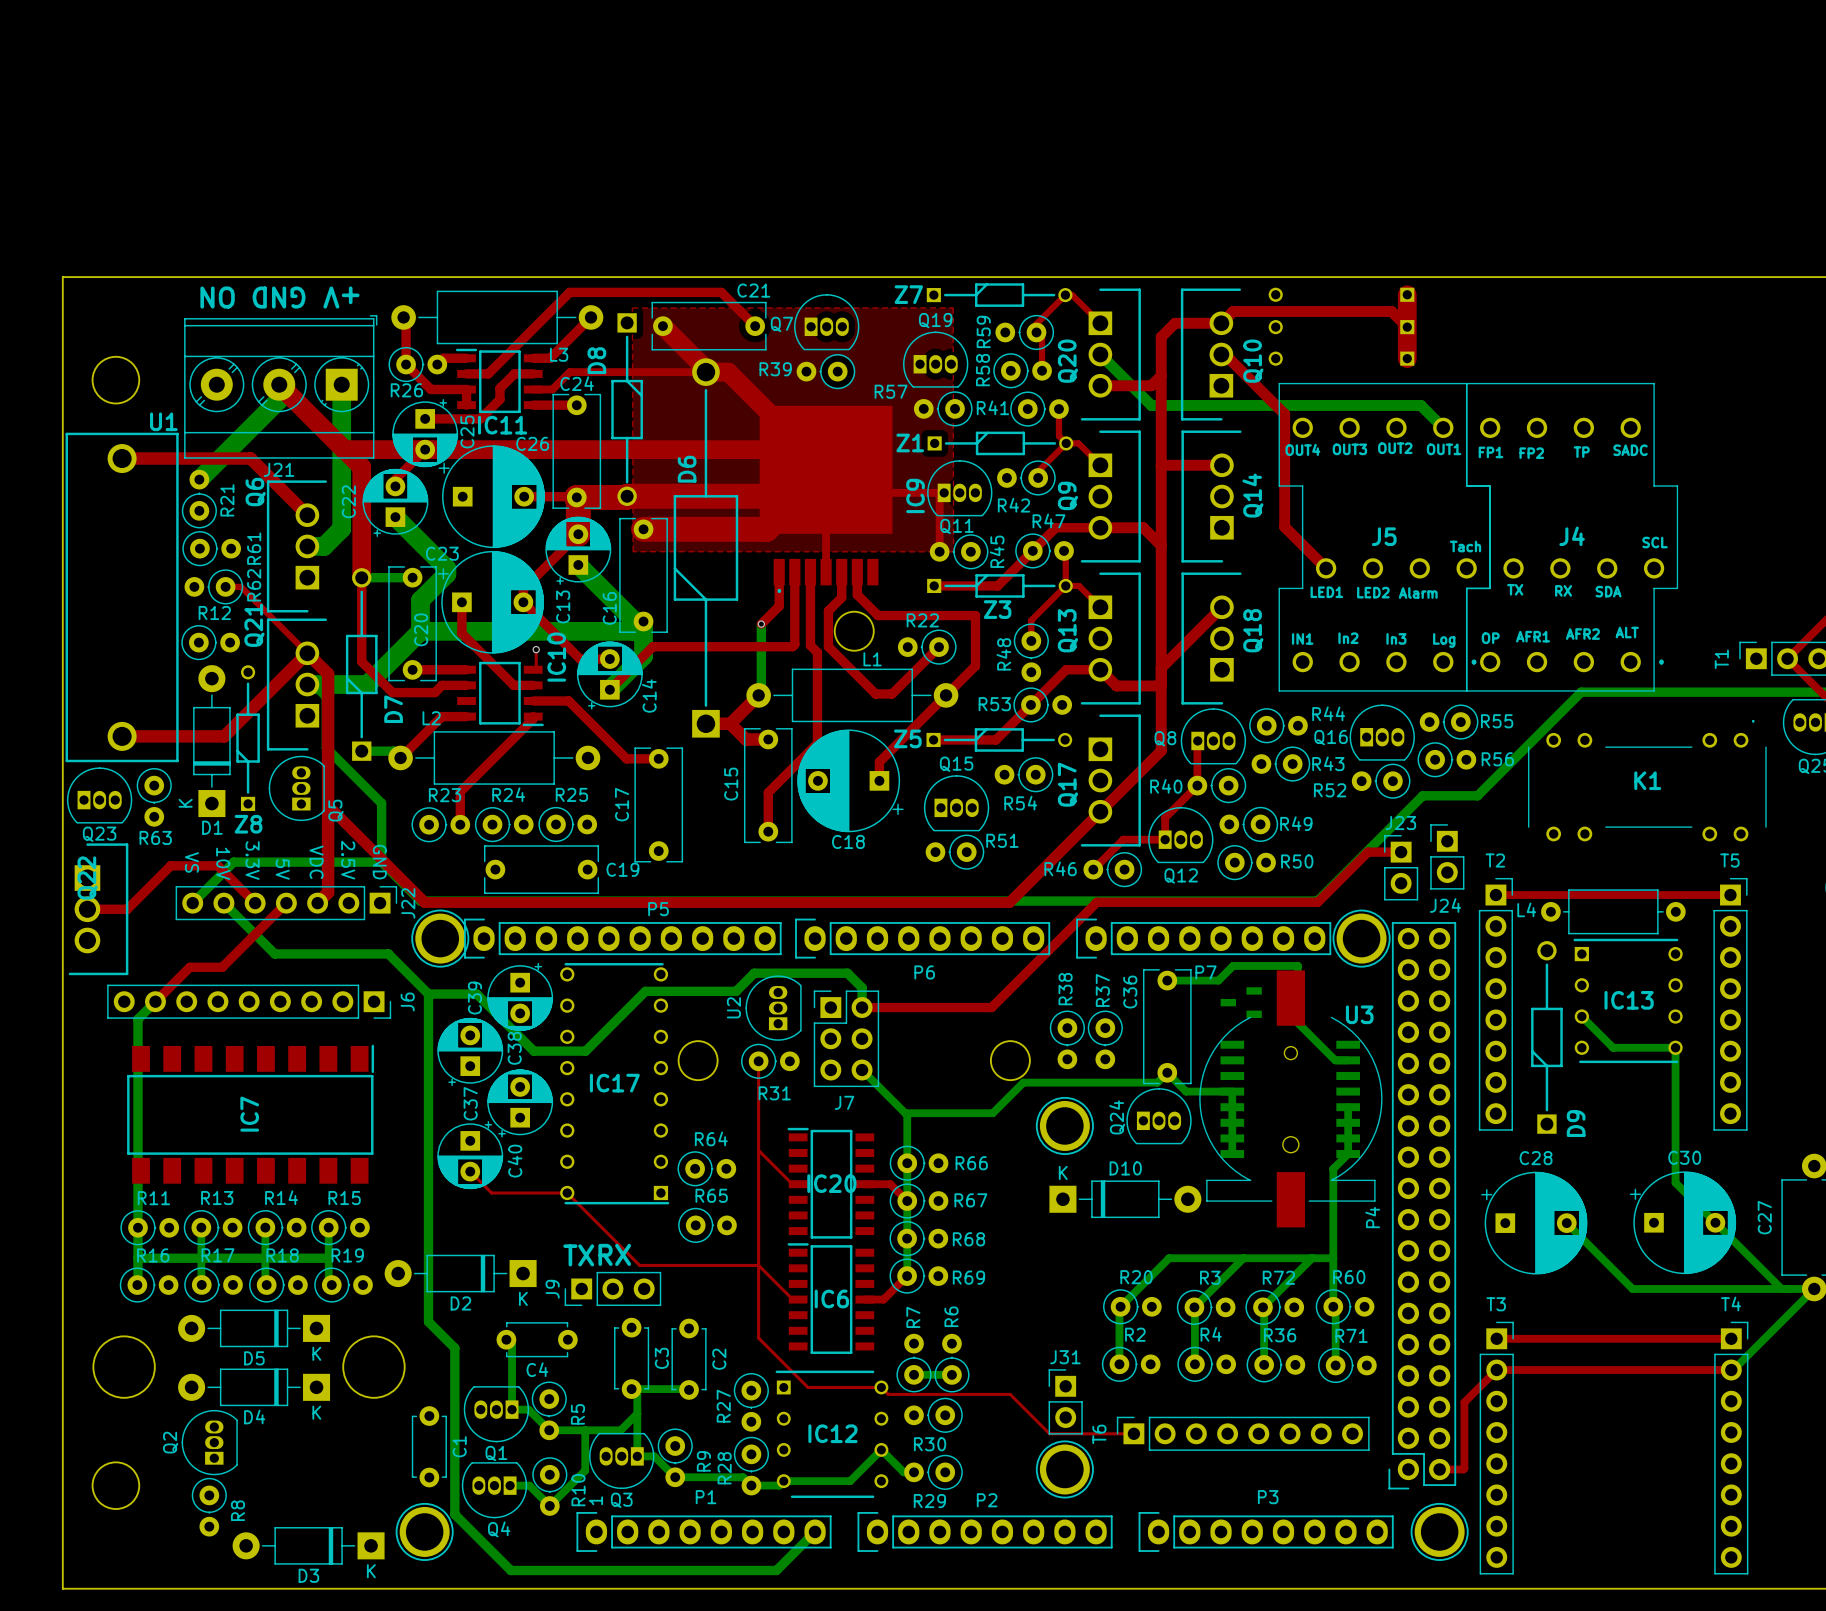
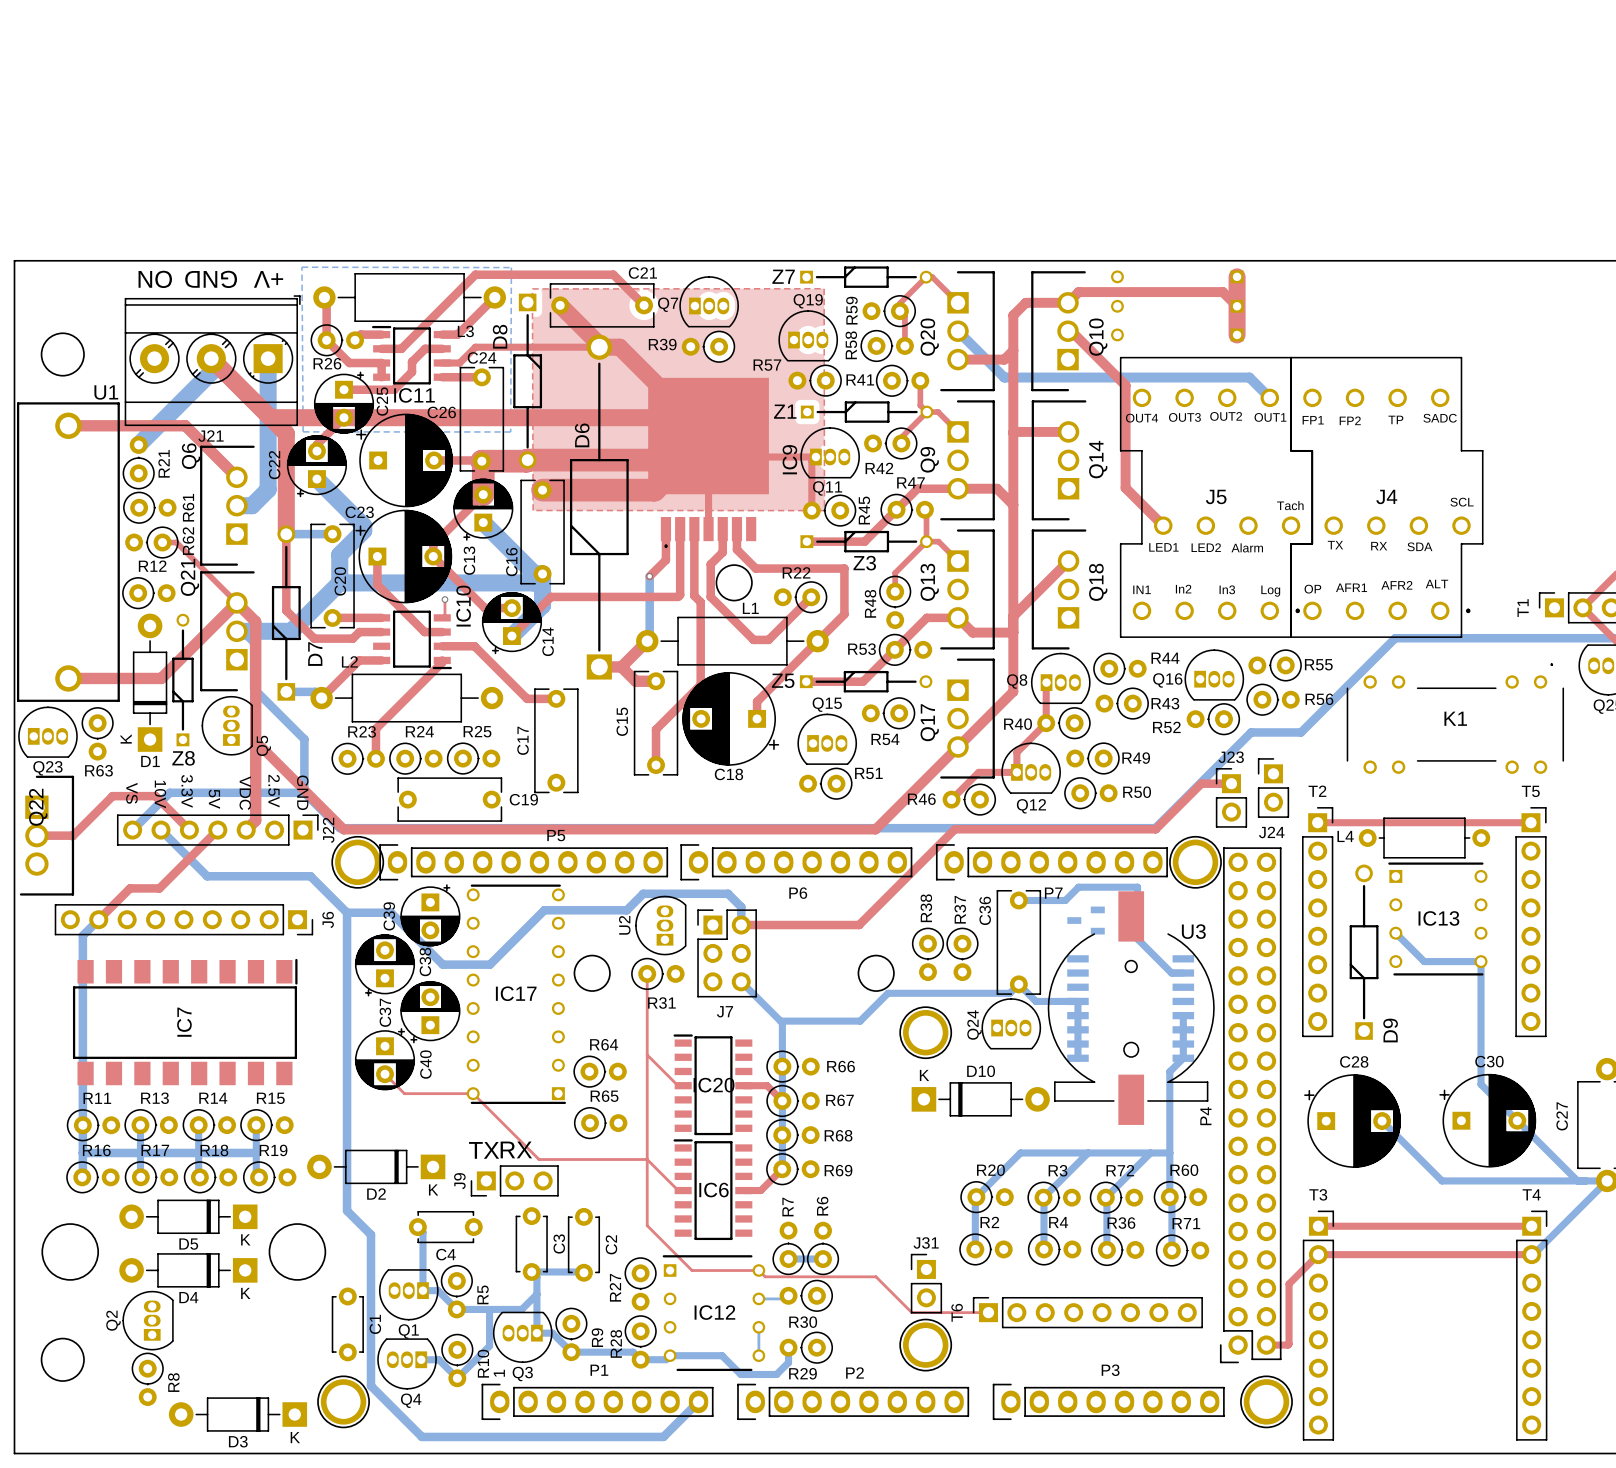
bottom zone outline: none -> (301, 267) (303, 431) (510, 431) (511, 267) (301, 267)
bottom track: none -> (788, 1295) (785, 1298) (758, 1298)
bottom track: none -> (758, 1327) (758, 1355)
bottom track: (914, 1472) (903, 1472) (881, 1449) (850, 1481) (840, 1481) -> (788, 1347) (788, 1362) (776, 1374) (740, 1374) (722, 1355)

